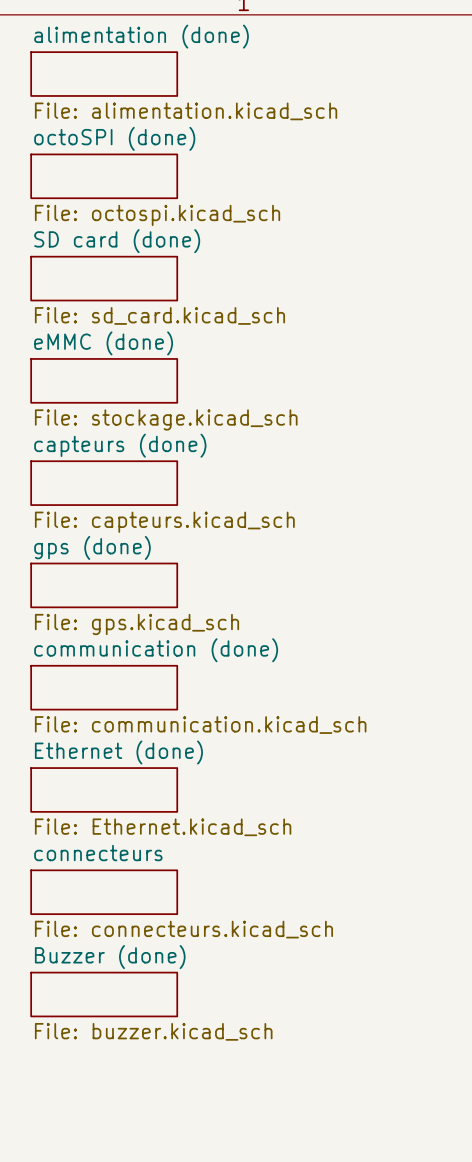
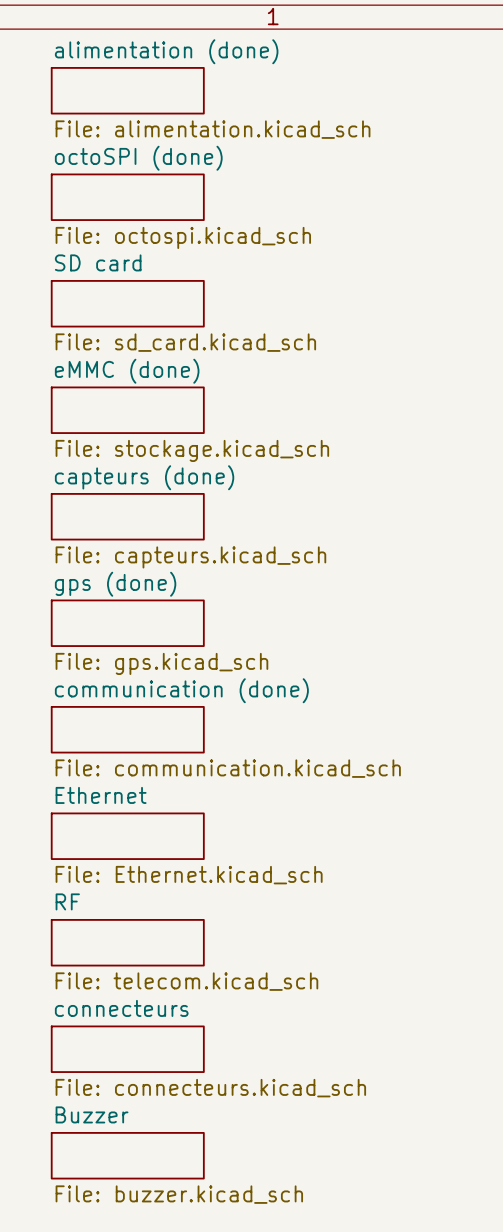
sheet SD card (done) name: SD card (done) (117, 241) -> SD card (98, 262)
sheet Ethernet (done) name: Ethernet (done) (118, 752) -> Ethernet (101, 795)
sheet connecteurs name: connecteurs (98, 853) -> RF (67, 901)
sheet connecteurs value: File: connecteurs.kicad_sch (183, 929) -> File: telecom.kicad_sch (186, 981)
sheet Buzzer (done) name: Buzzer (done) (110, 957) -> connecteurs (121, 1008)
sheet Buzzer (done) value: File: buzzer.kicad_sch (153, 1031) -> File: connecteurs.kicad_sch (210, 1088)
sheet Buzzer: none -> File: buzzer.kicad_sch (127, 1155)

